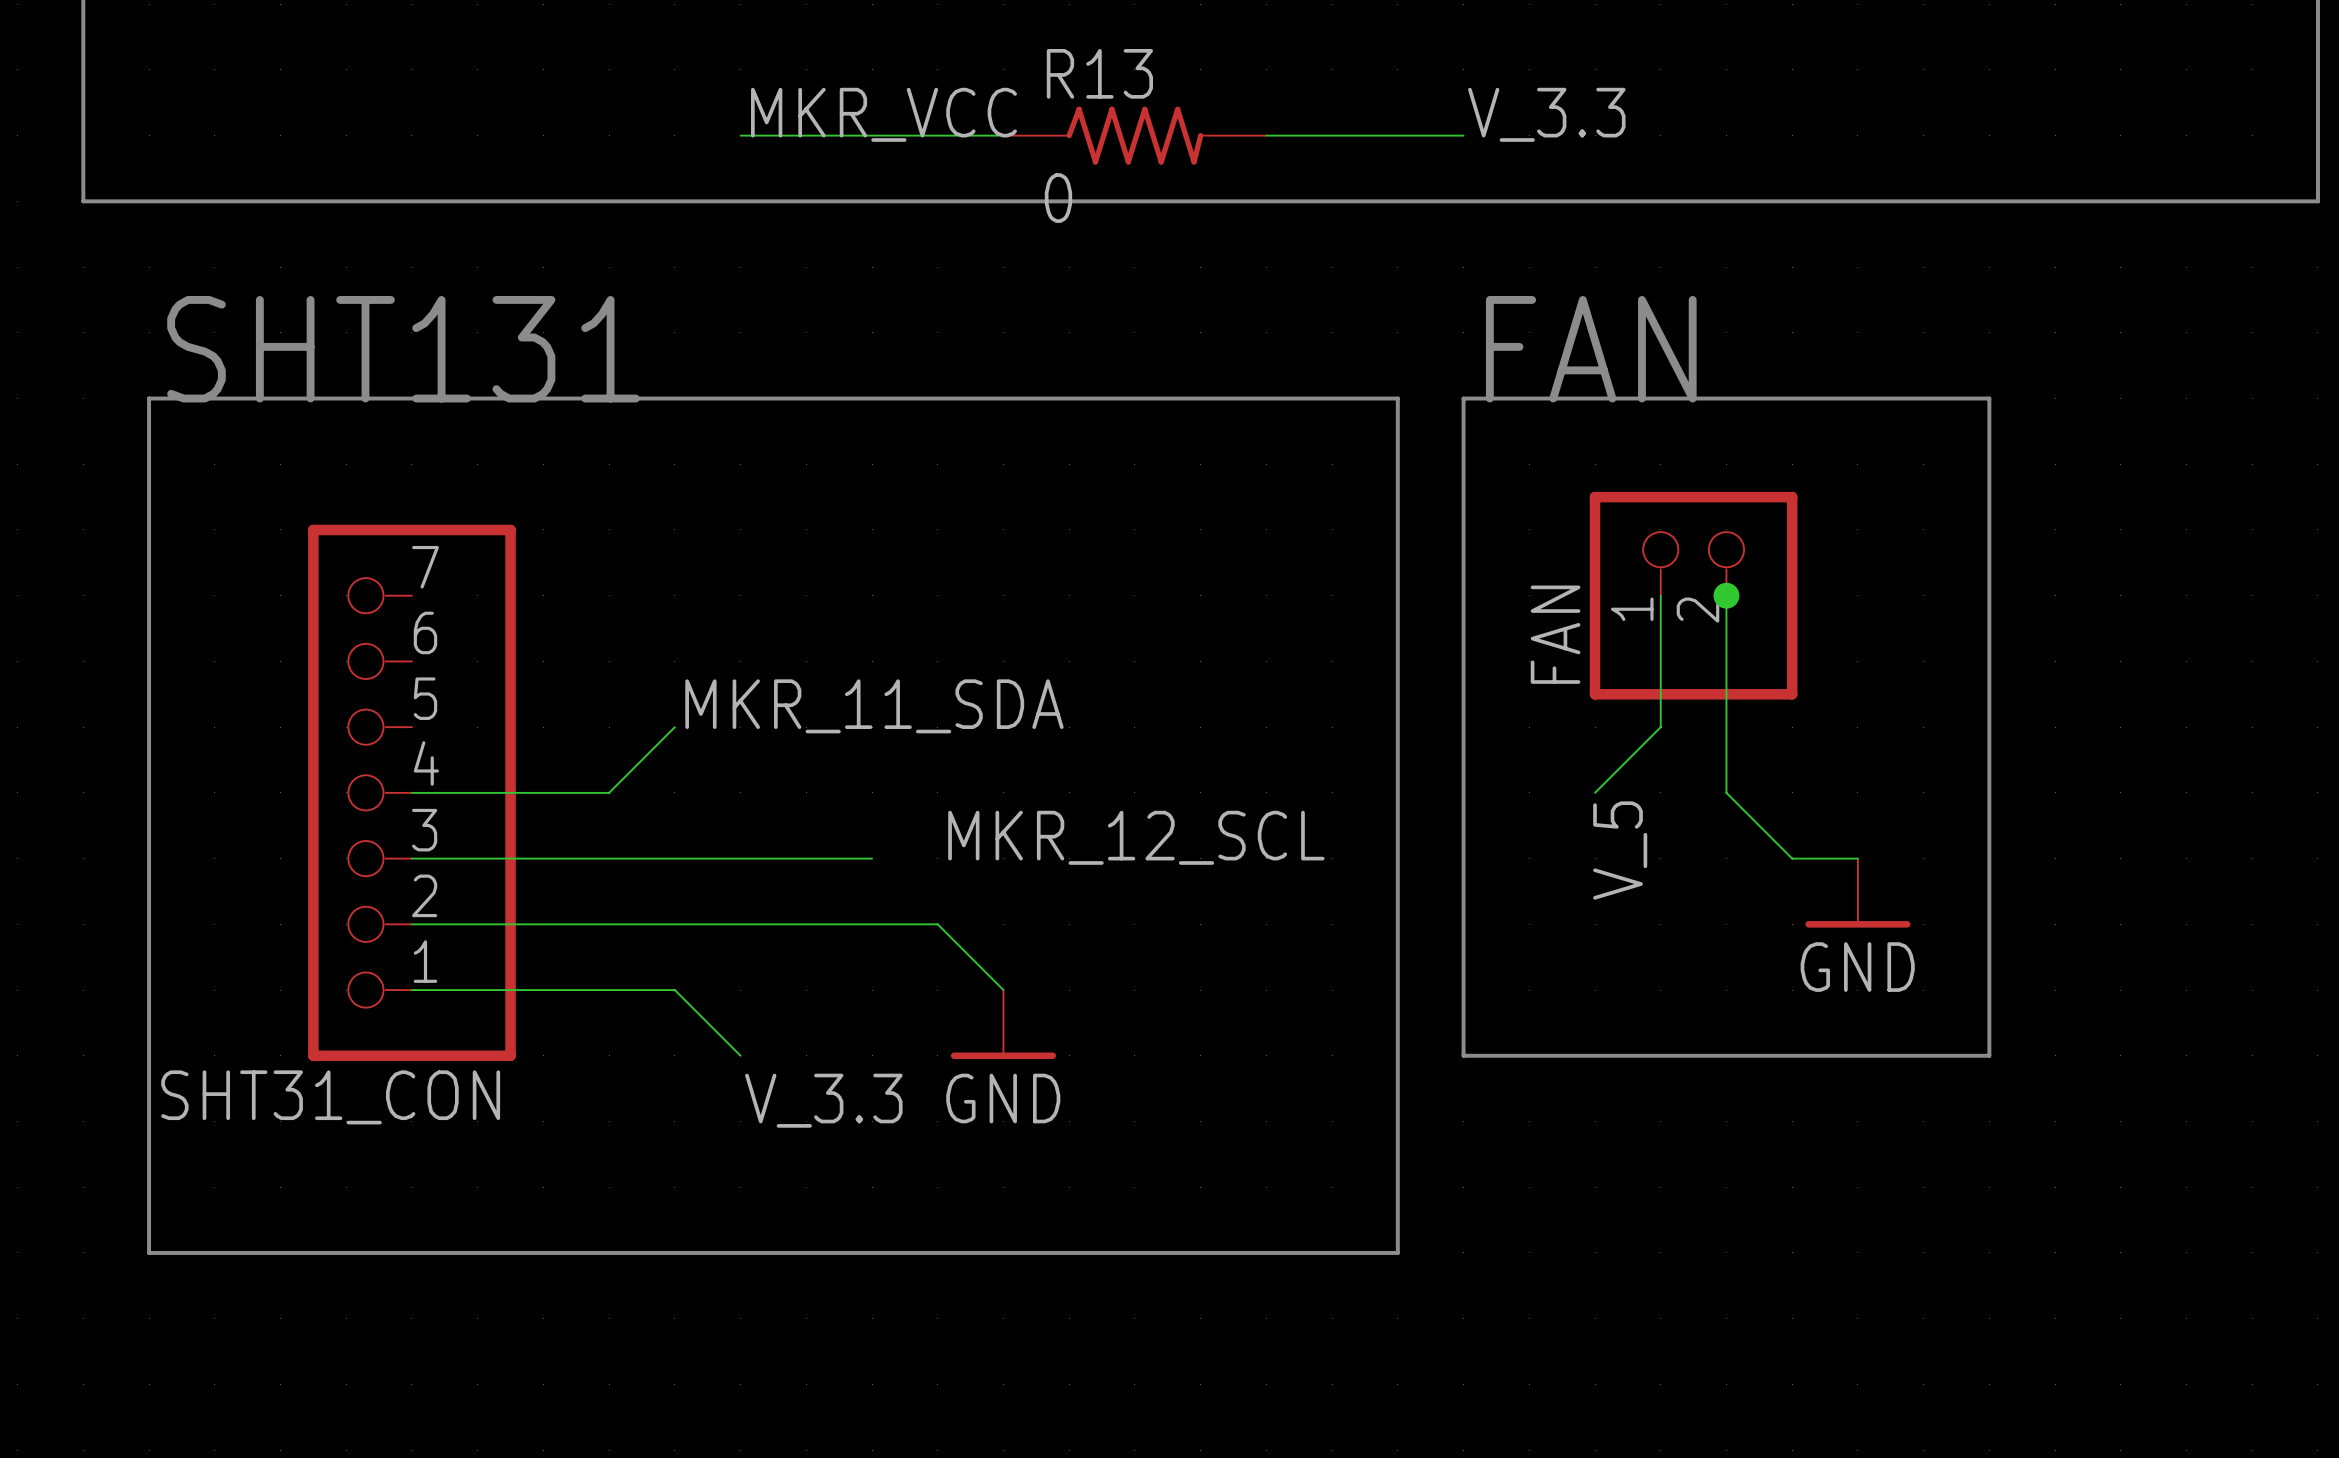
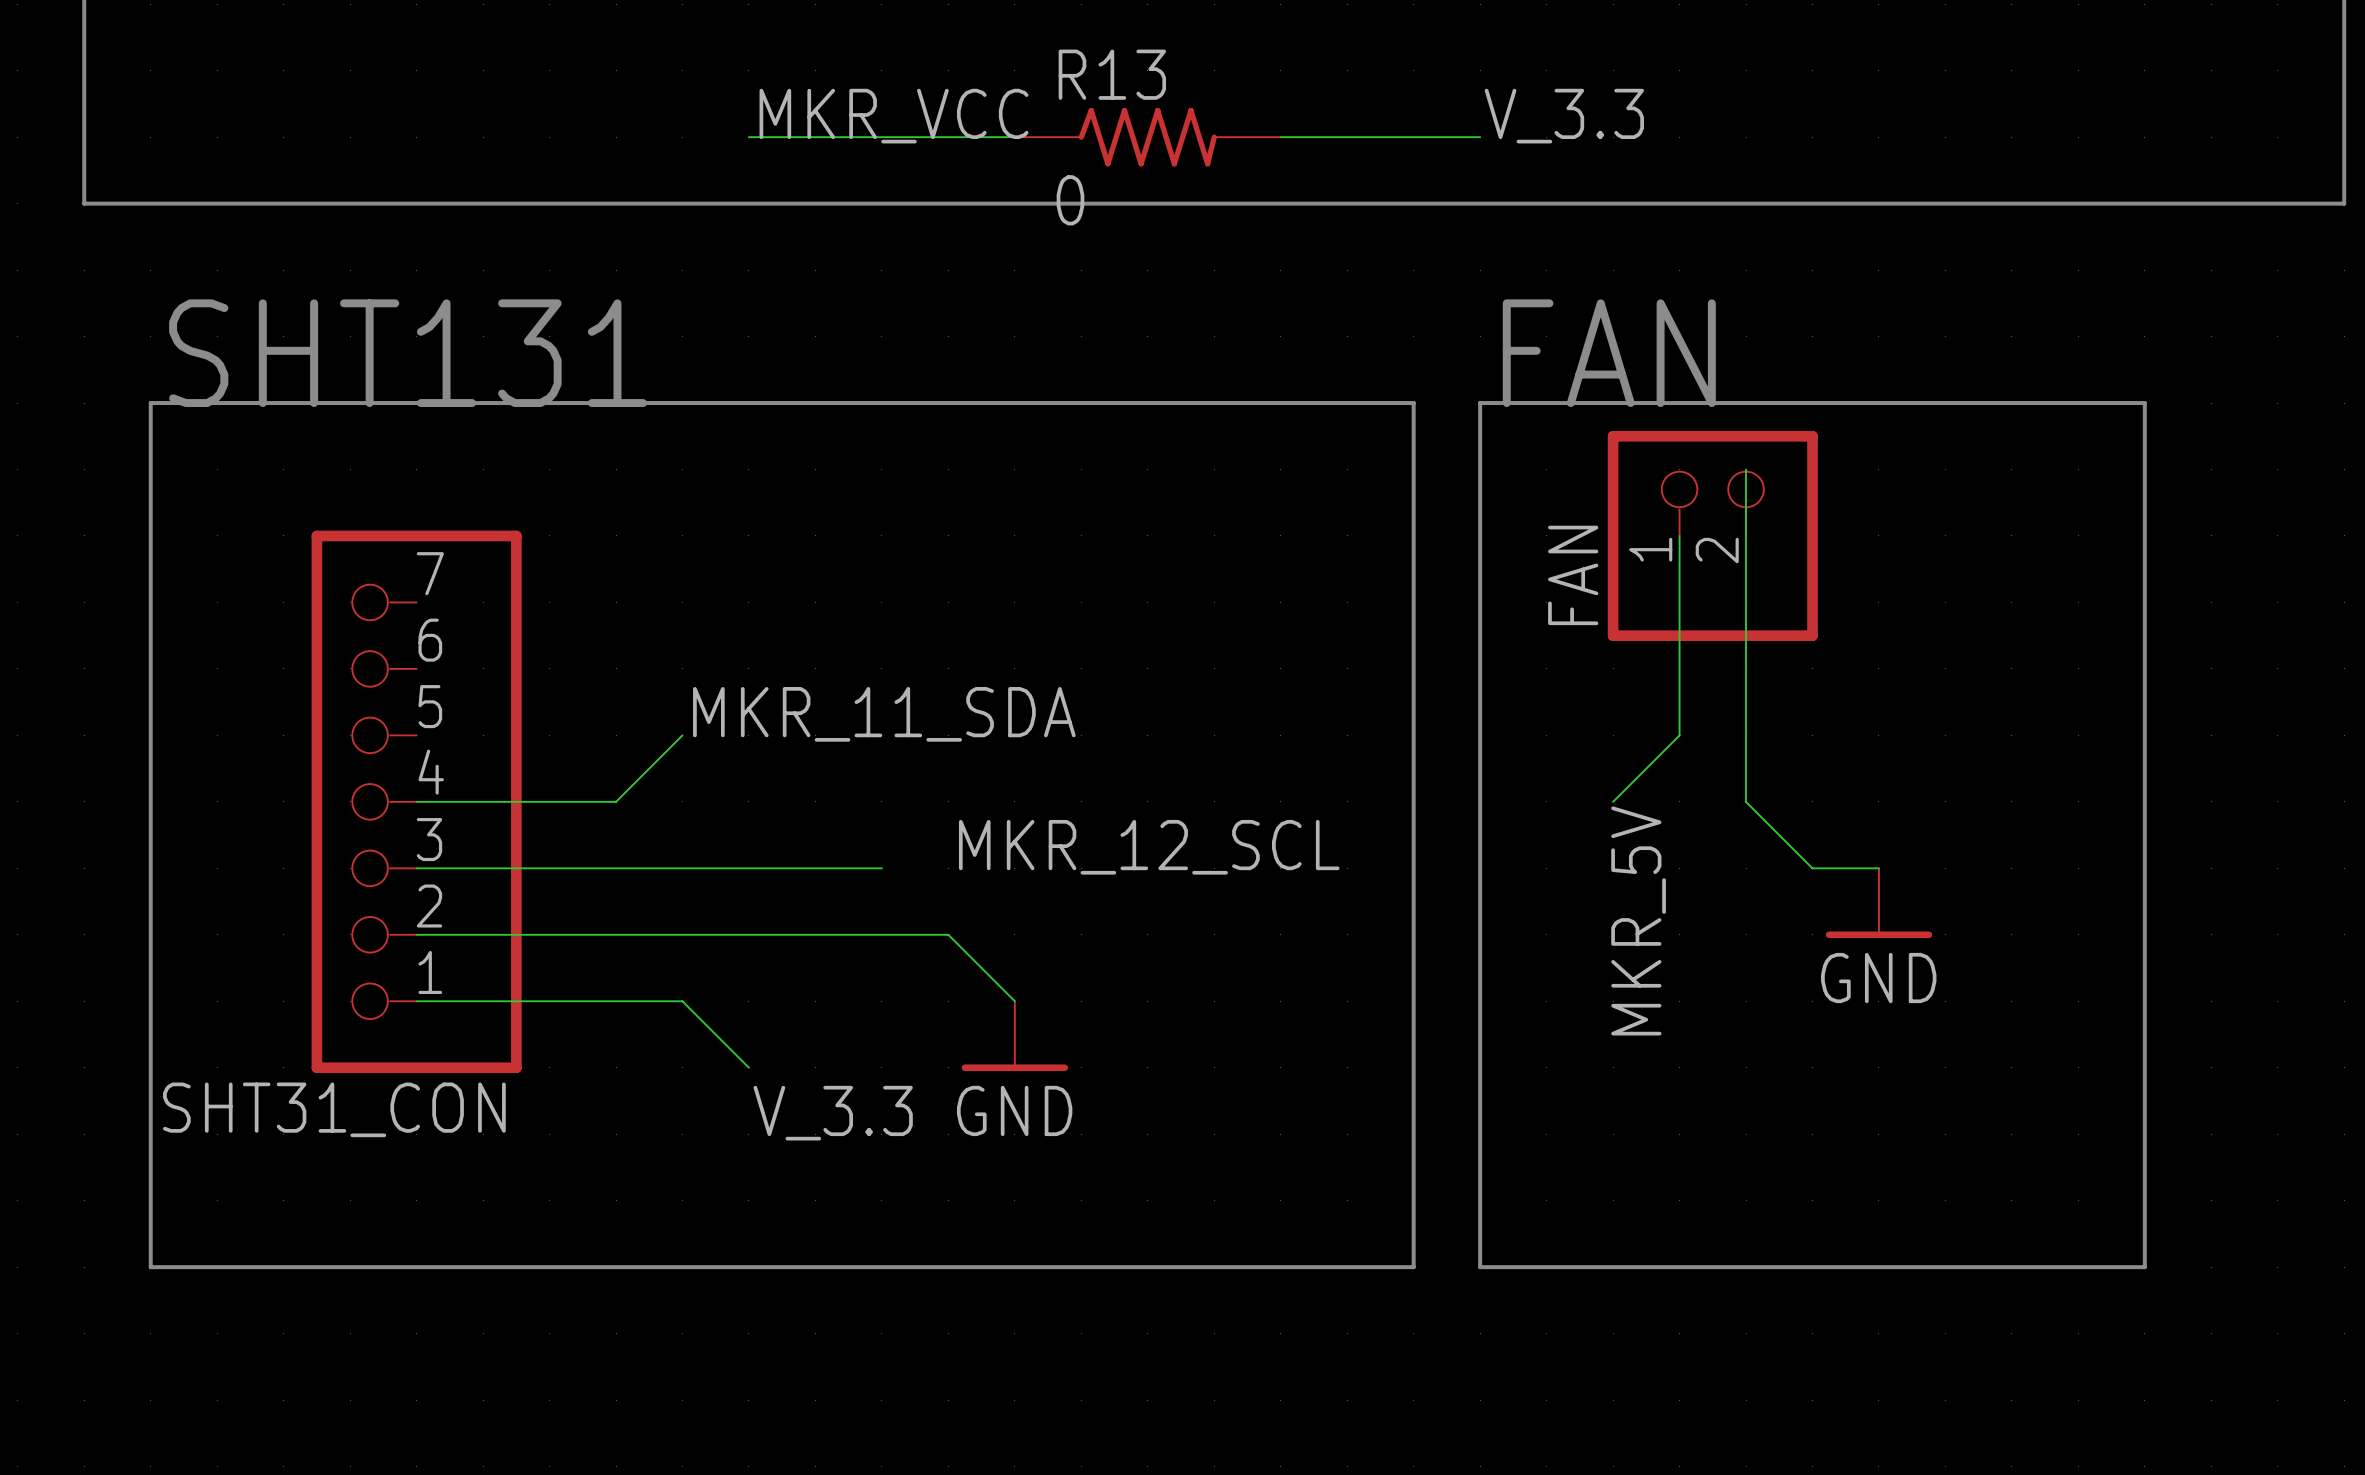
line: (1989, 398) (1989, 1055) (1463, 1055) -> (2011, 403) (2144, 403) (2144, 1267) (1480, 1267) (1480, 1067)
wire: none -> (1746, 469) (1746, 602)
wire: none -> (1679, 535) (1679, 602)
FAN position: (1693, 595) -> (1712, 535)
junction: (1726, 595) -> none
label: V_5 (1620, 850) -> MKR_5V (1638, 920)

